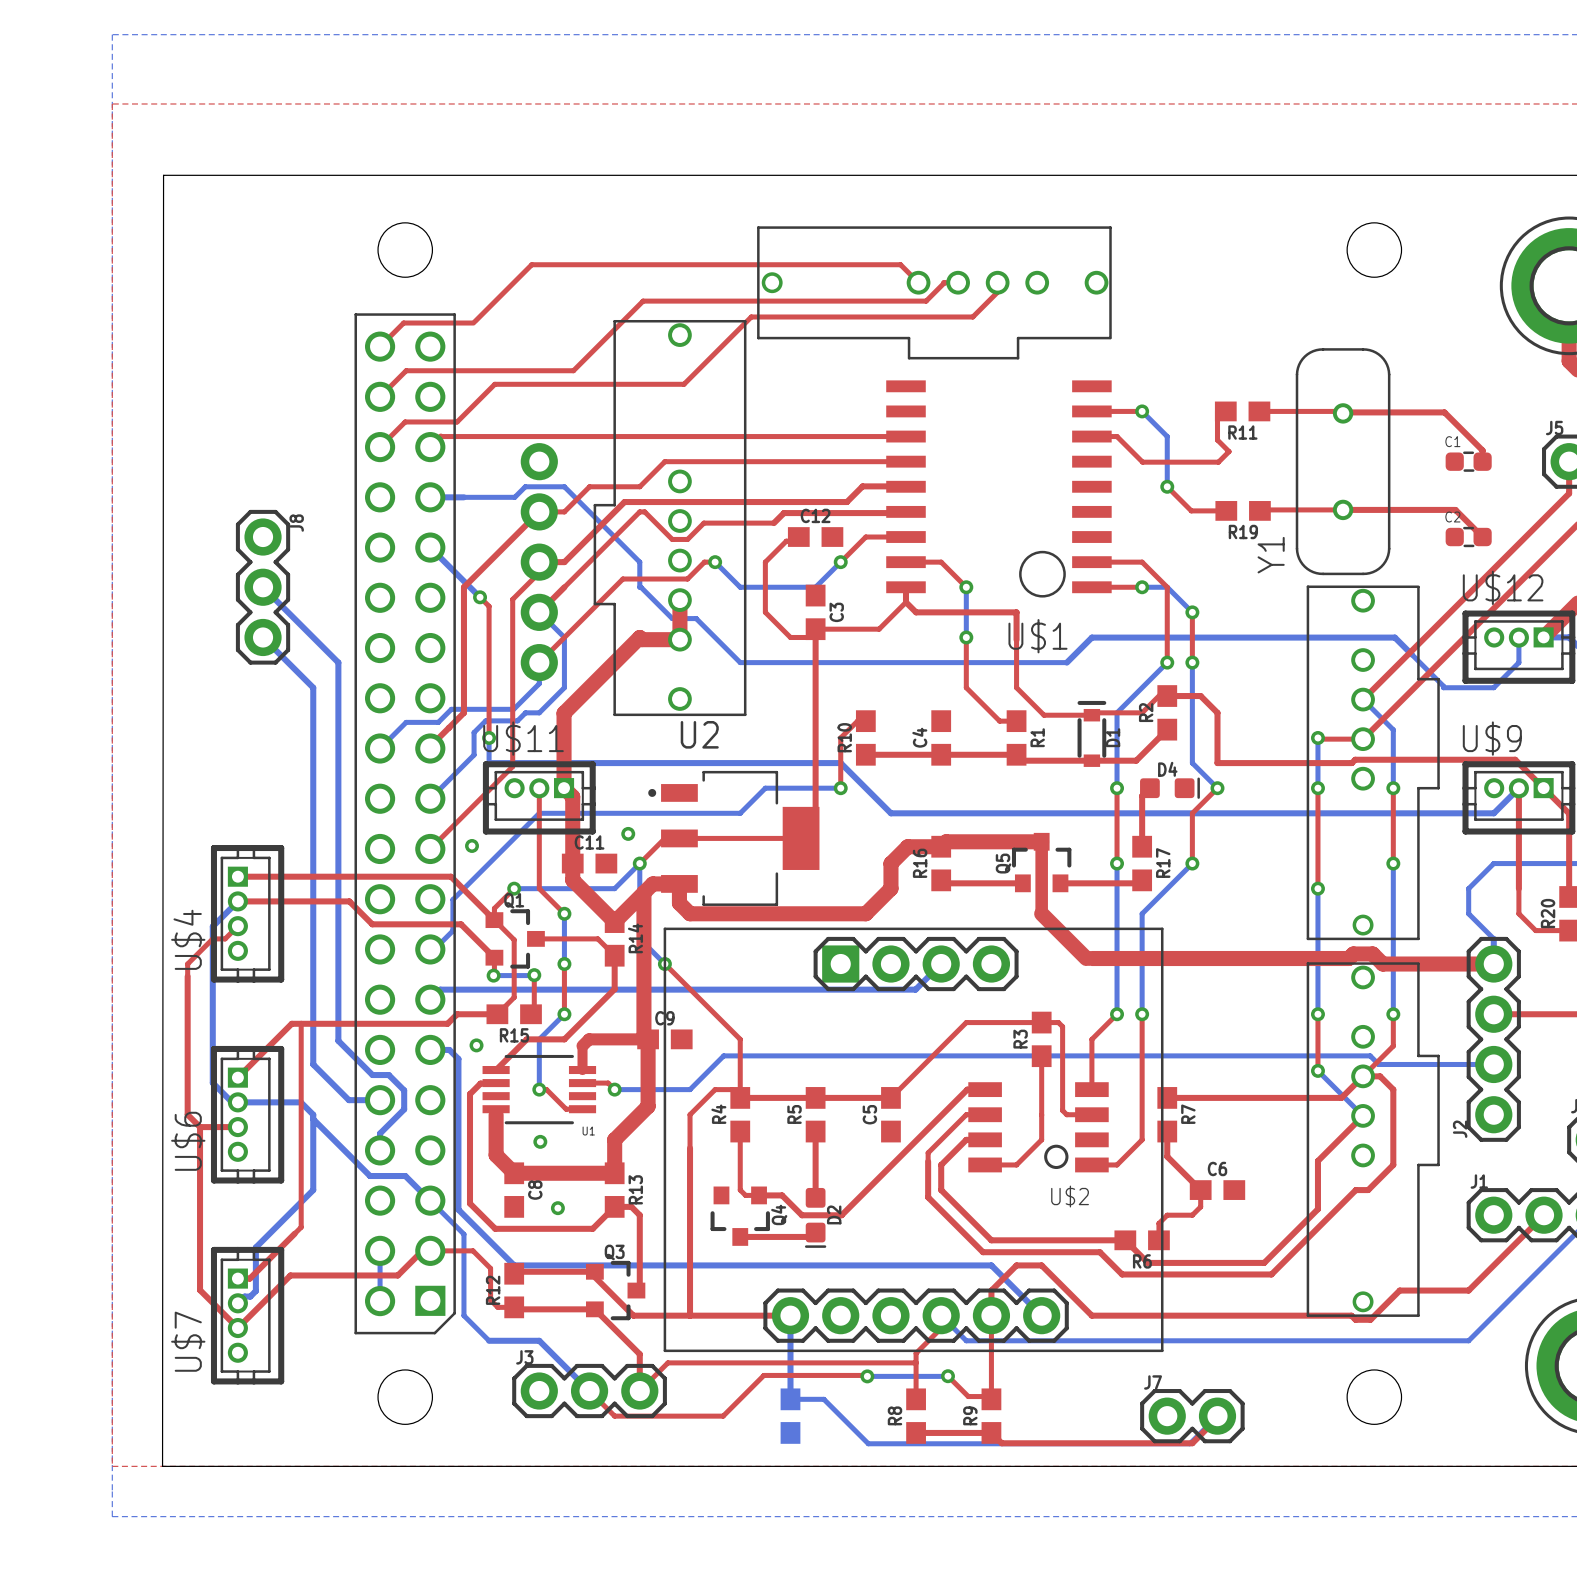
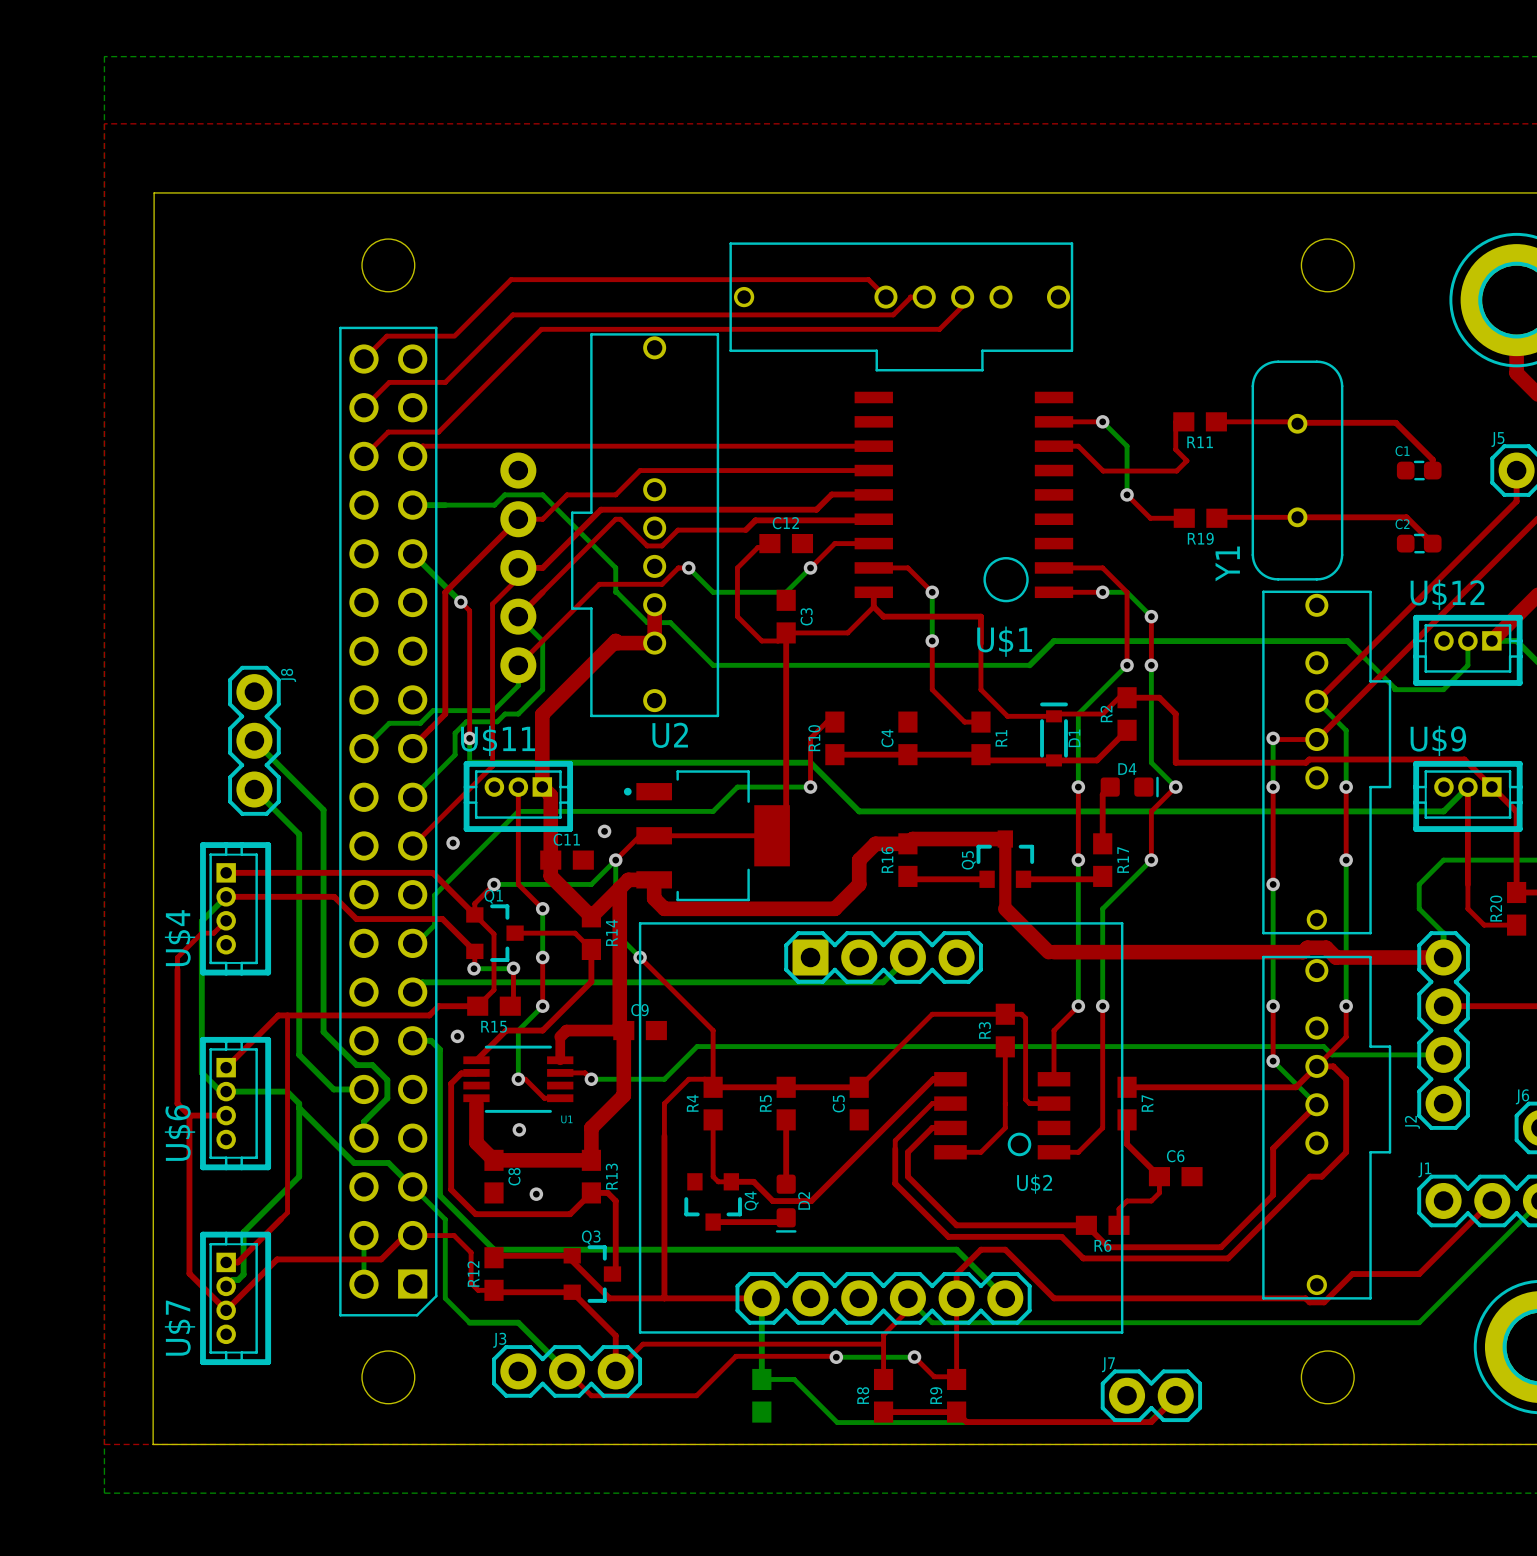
top track: (643, 301) (573, 370) (463, 370) -> (618, 314) (512, 314) (445, 382)
top track: (973, 315) (751, 316) (683, 384) (494, 384) -> (939, 329) (541, 329) (475, 395)
bottom track: (263, 587) (338, 662) (338, 811) -> (254, 740) (323, 809)
J8 position: (263, 587) -> (254, 740)
bottom track: (263, 637) (313, 687) (313, 836) -> (254, 789) (299, 834)

